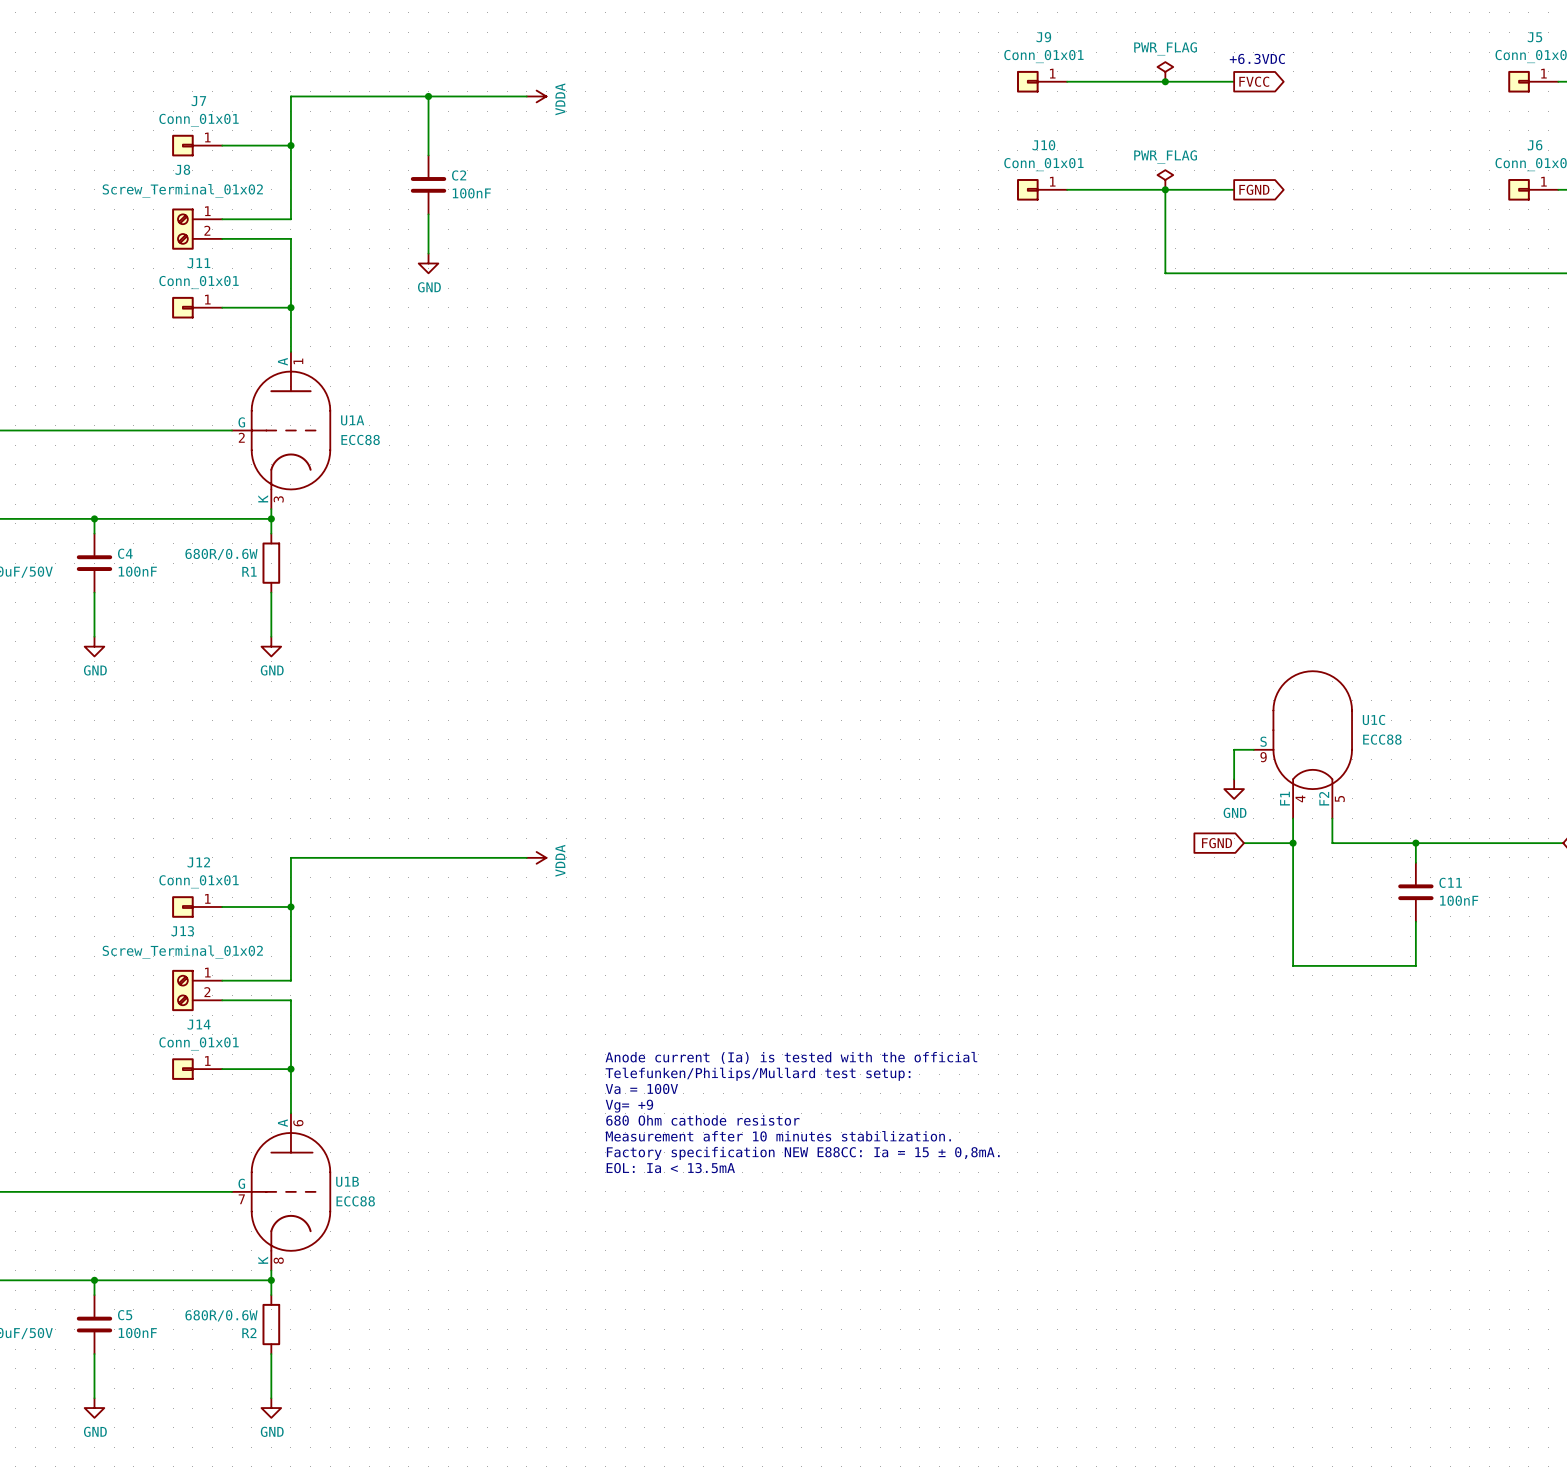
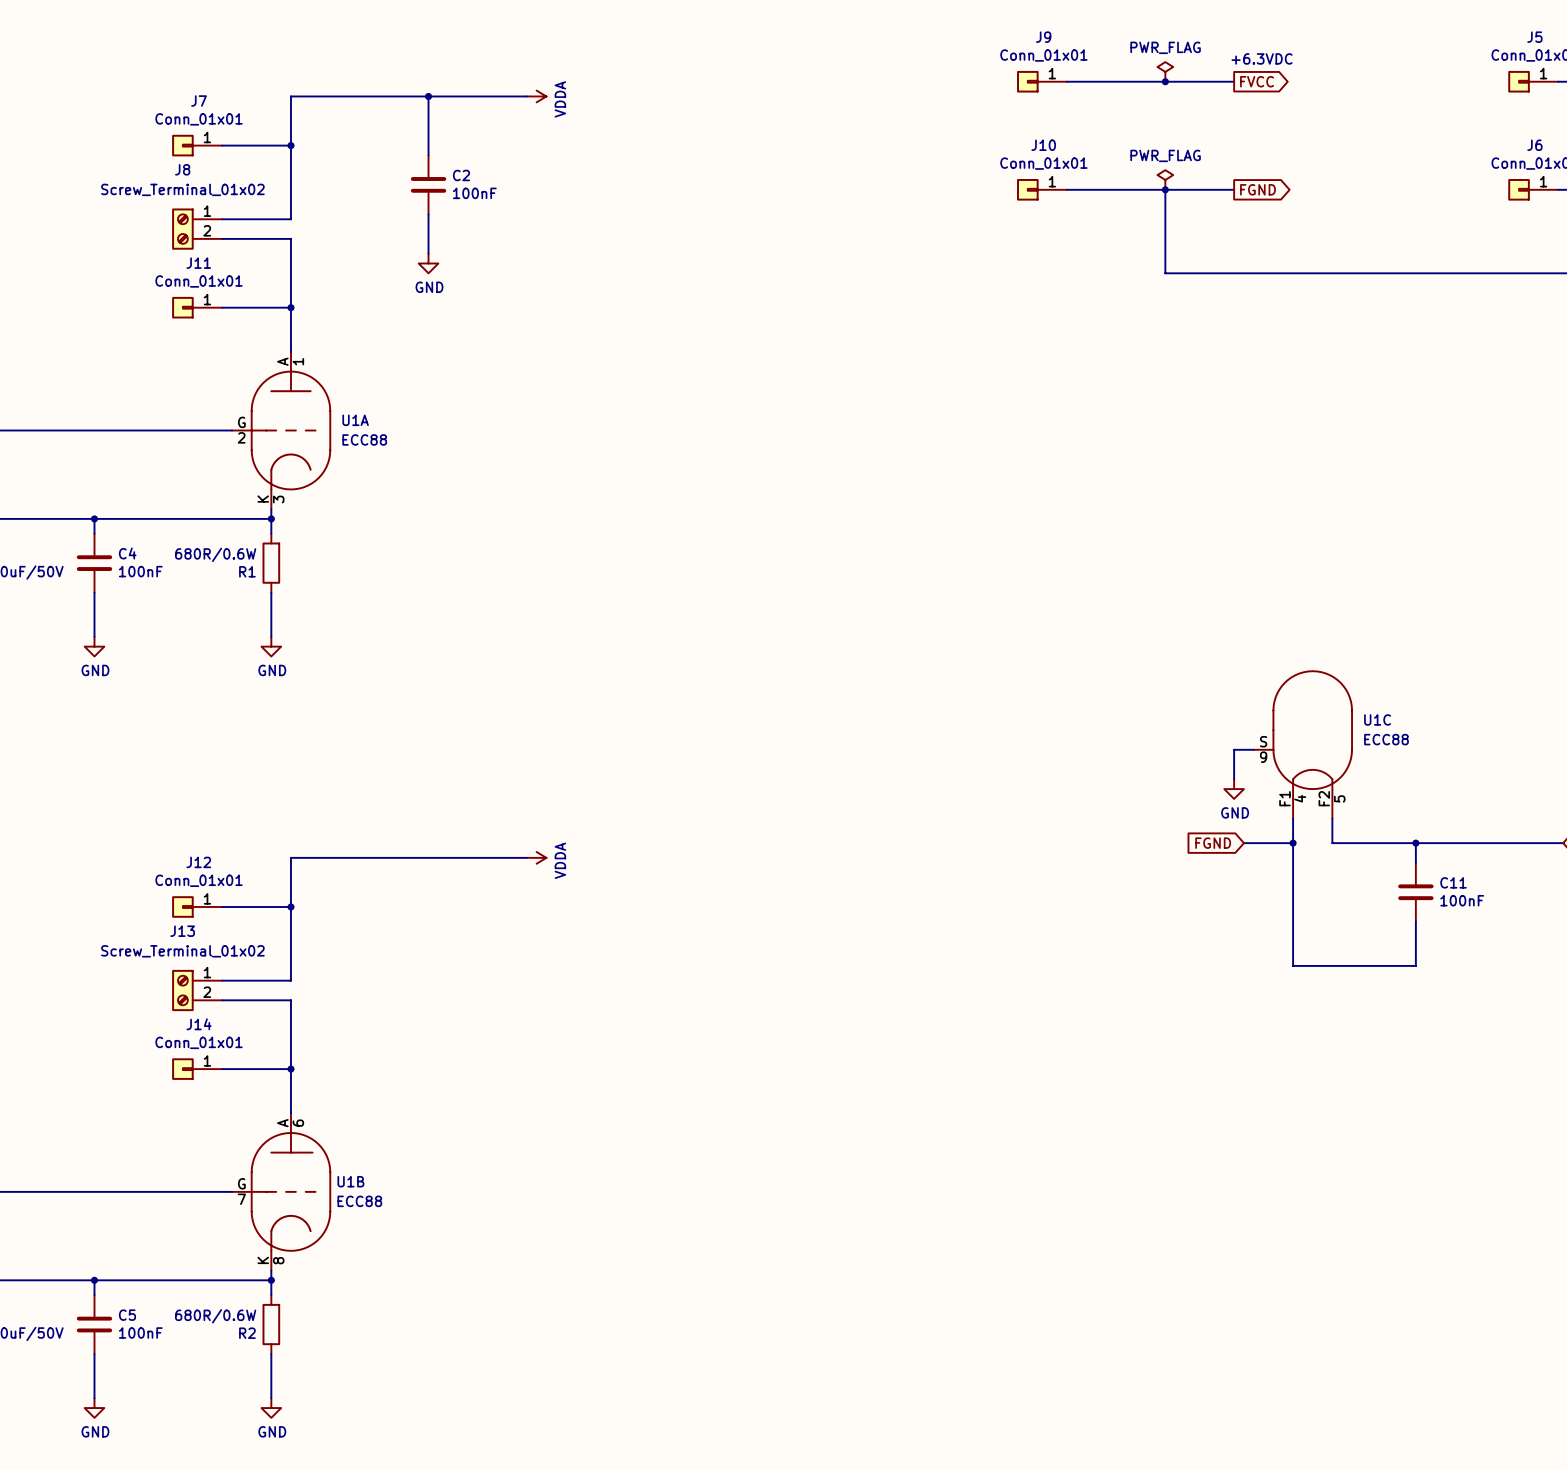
text: Anode current (Ia) is tested with the official (791, 1057) -> none
text: Telefunken/Philips/Mullard test setup: (758, 1074) -> none
text: Va = 100V (641, 1088) -> none
text: Vg= +9 (629, 1106) -> none
text: 680 Ohm cathode resistor (702, 1120) -> none
text: Measurement after 10 minutes stabilization. (778, 1136) -> none
text: Factory specification NEW E88CC: Ia = 15 ± 0,8mA. (803, 1153) -> none
text: EOL: Ia < 13.5mA (670, 1168) -> none

